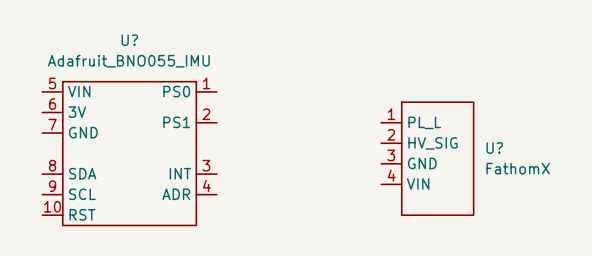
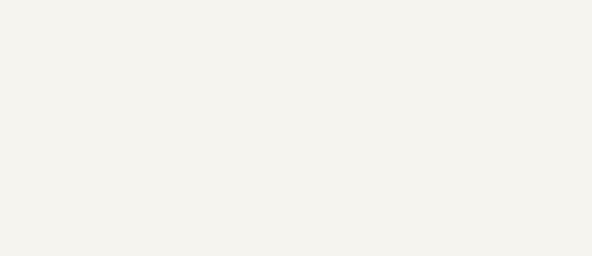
U?: Adafruit_BNO055_IMU (129, 153) -> none
U?: FathomX (427, 158) -> none

